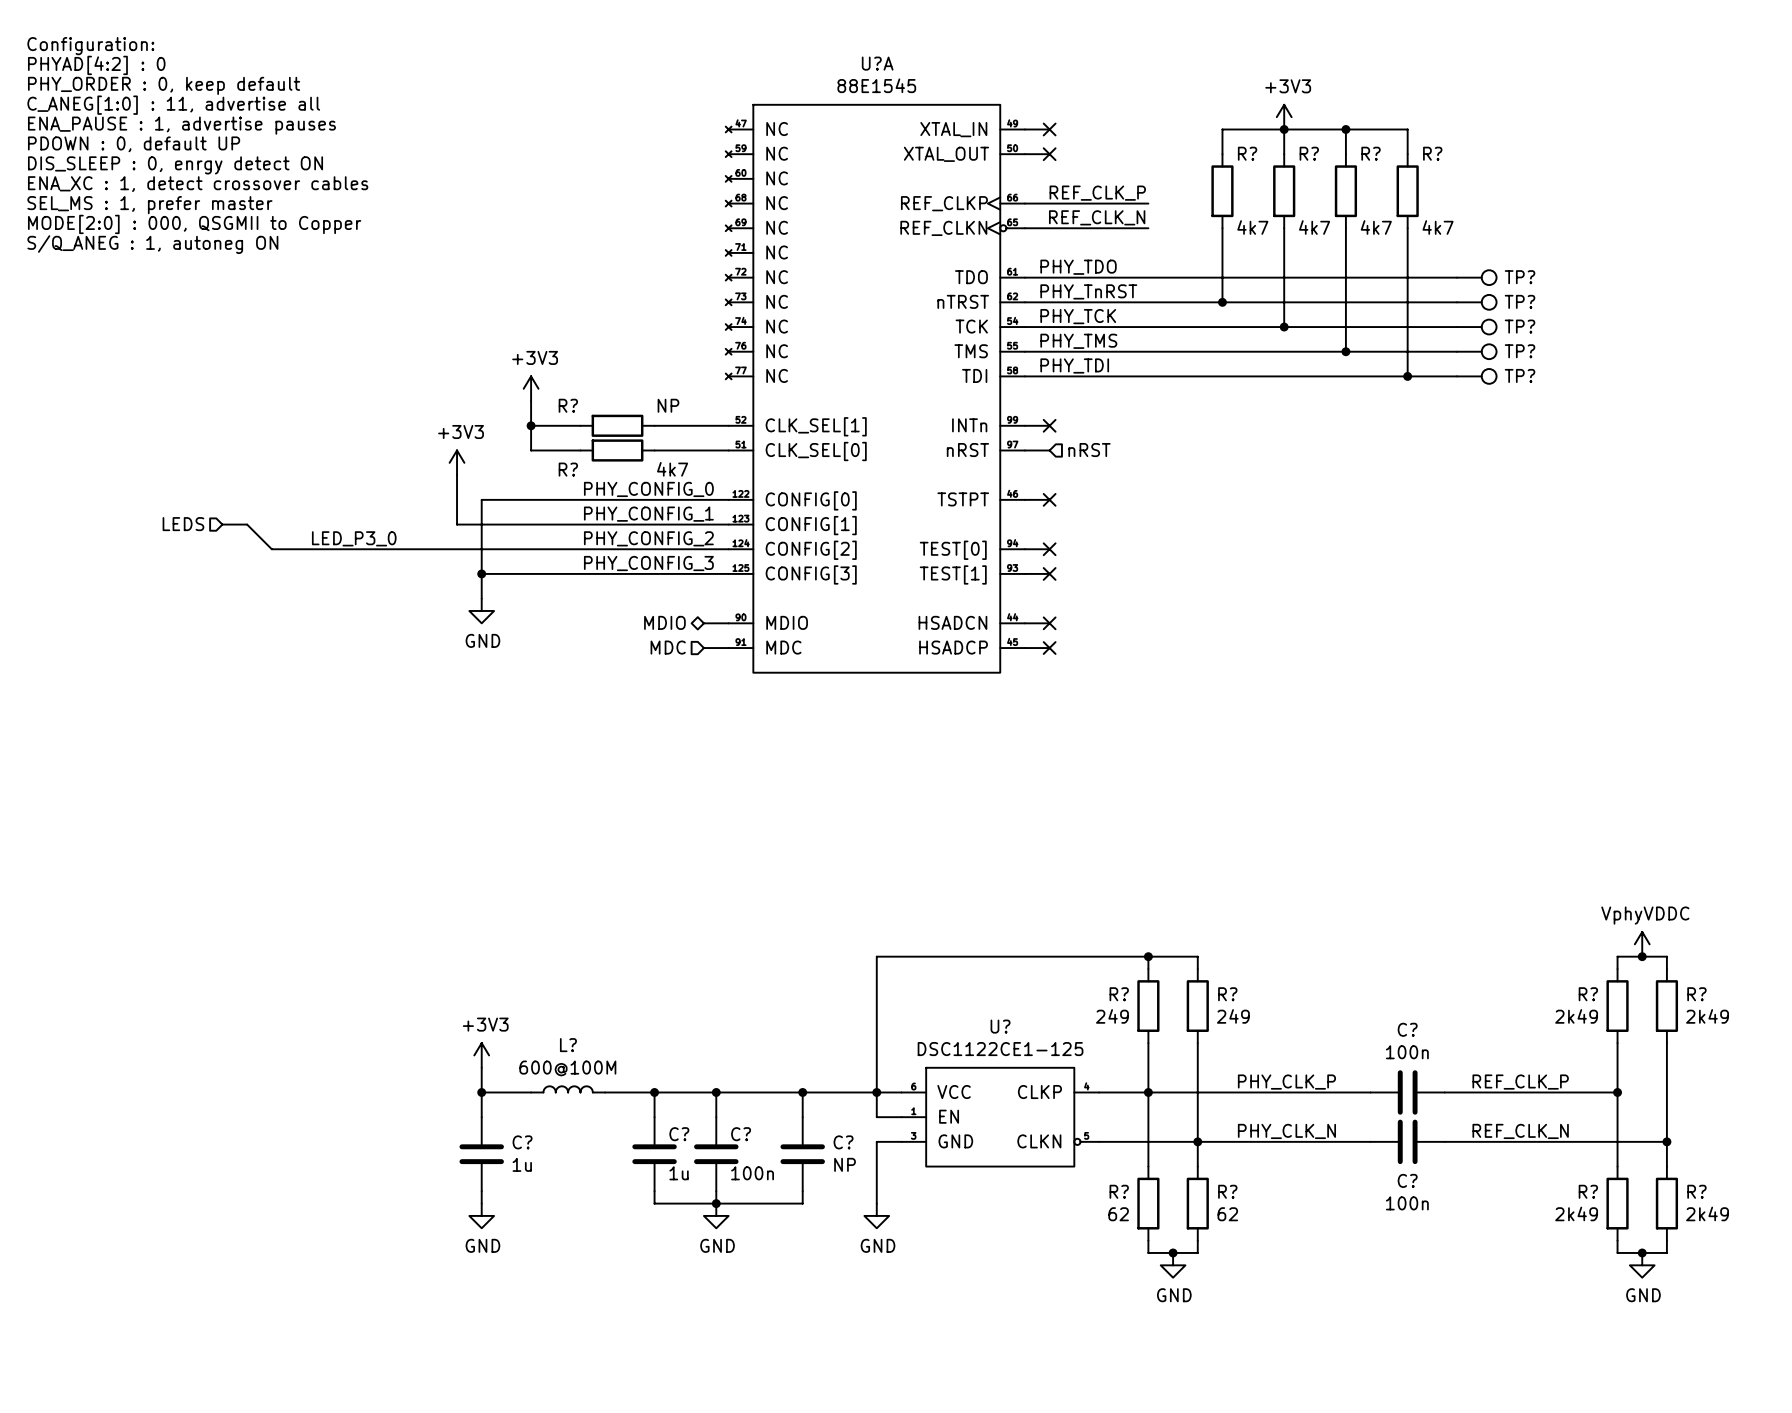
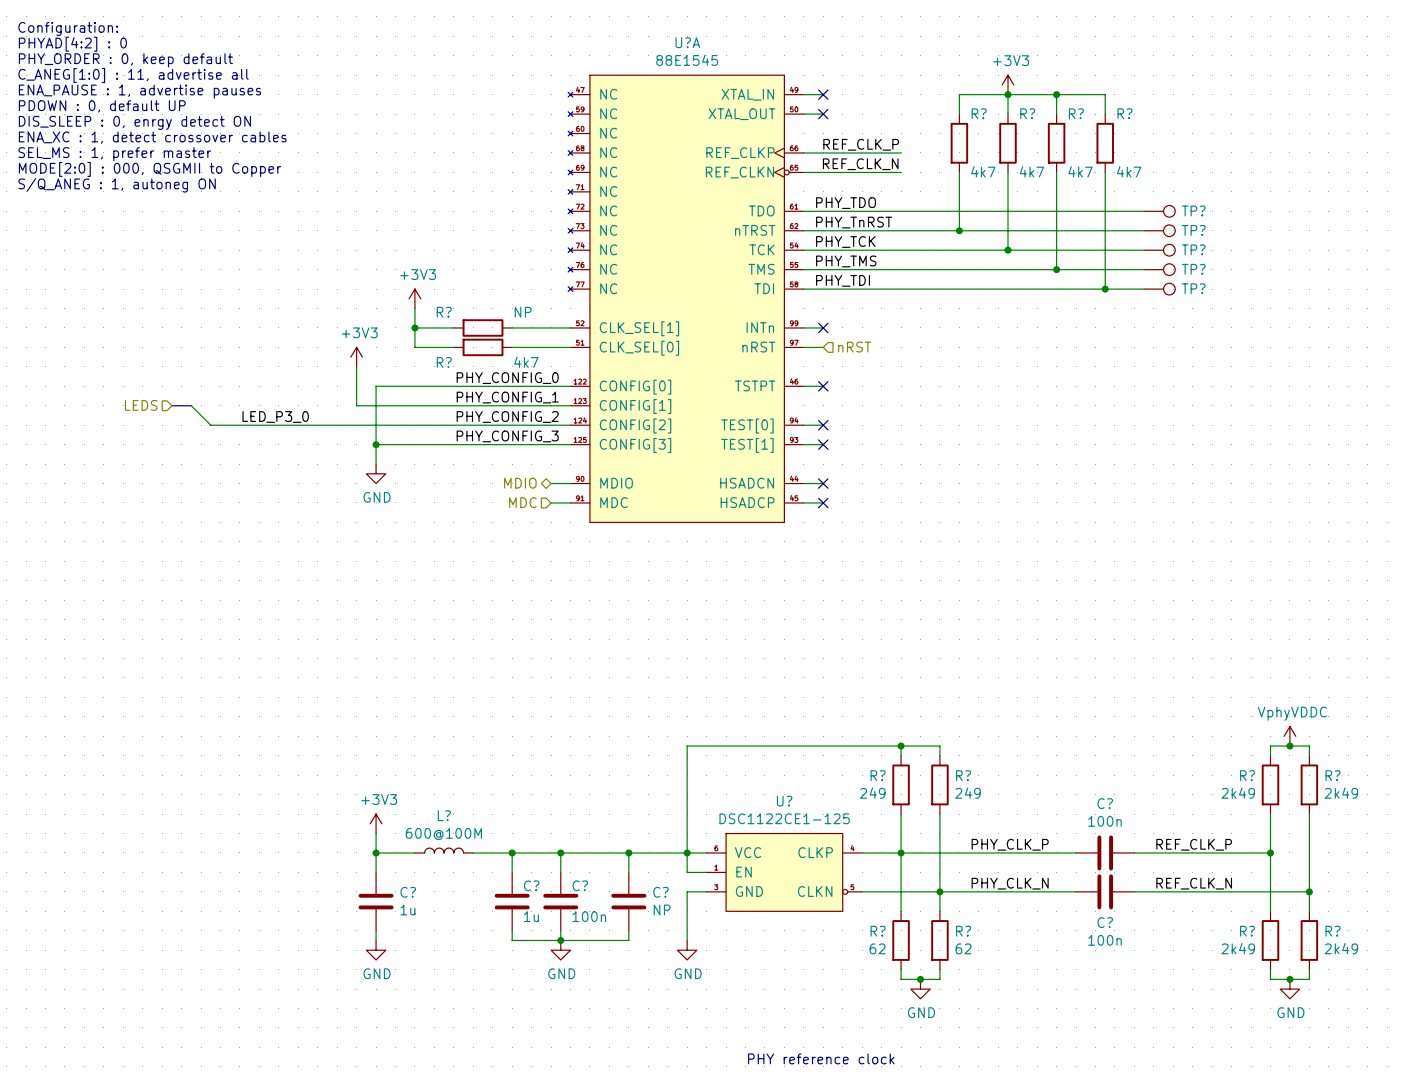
text: none -> PHY reference clock (821, 1058)

